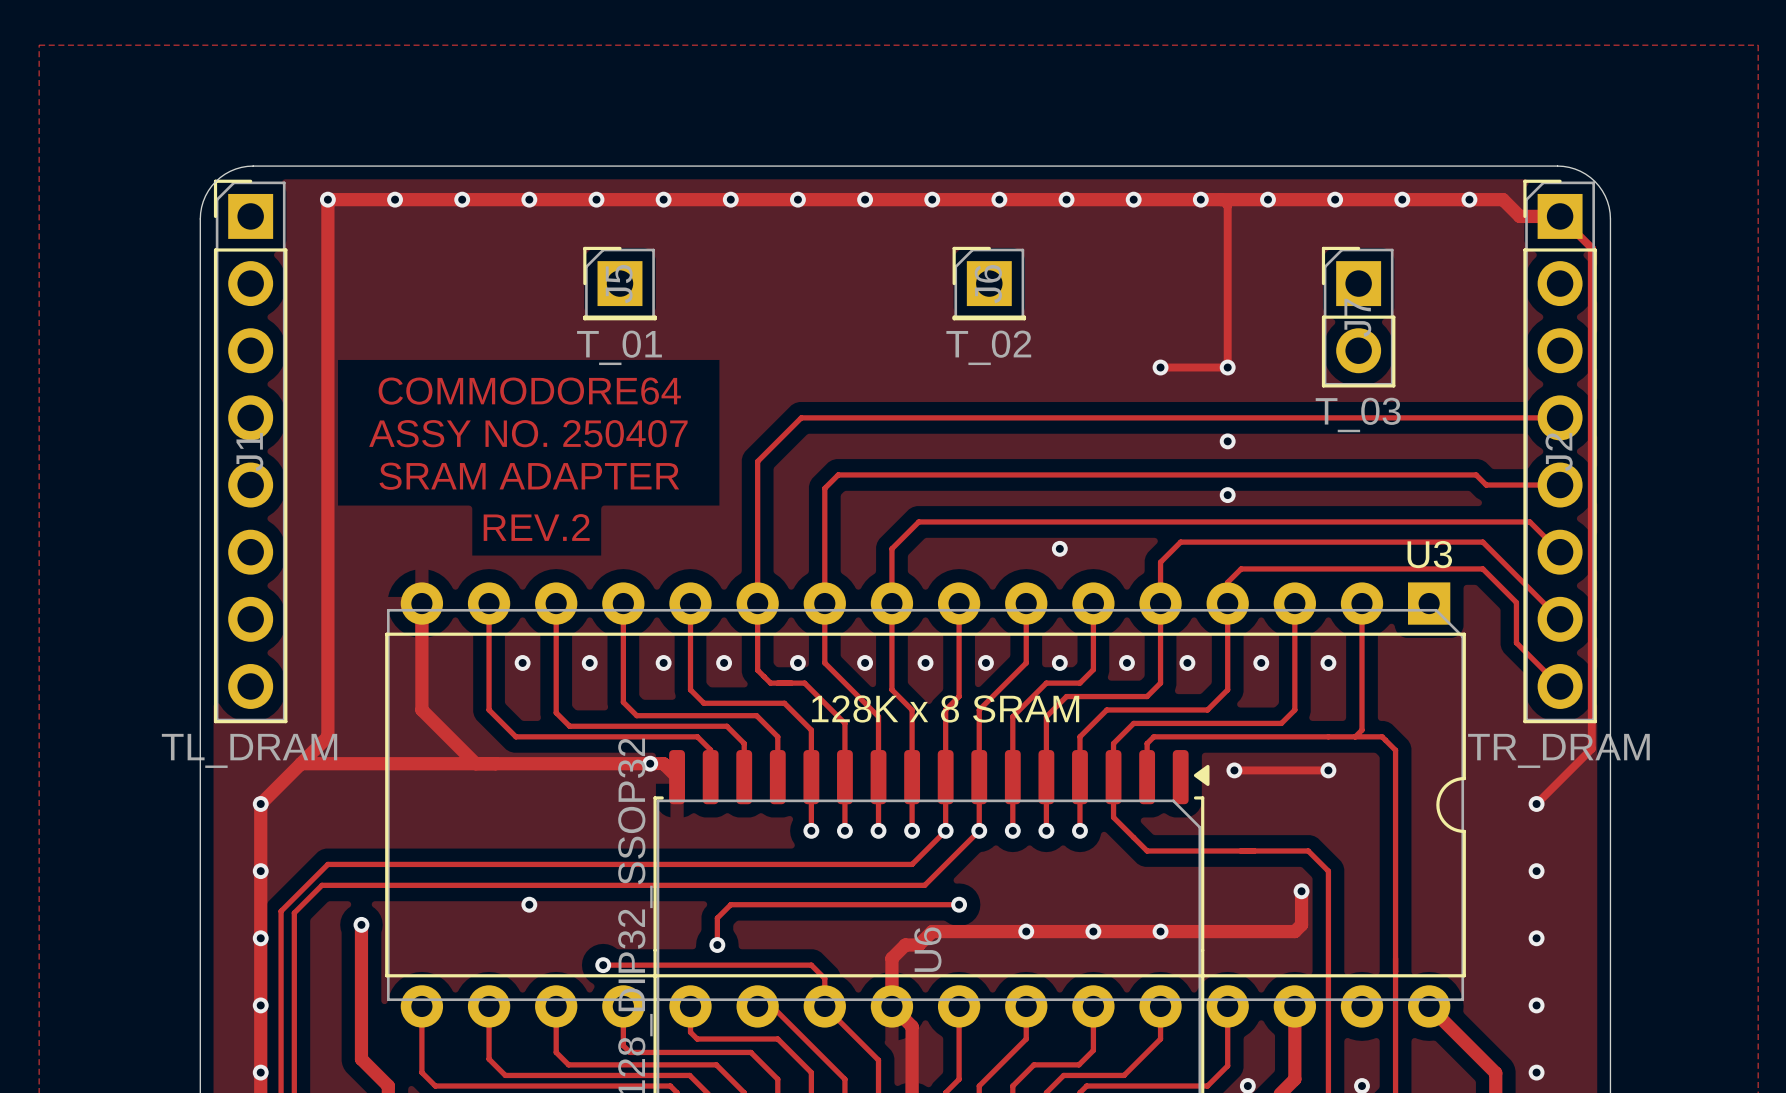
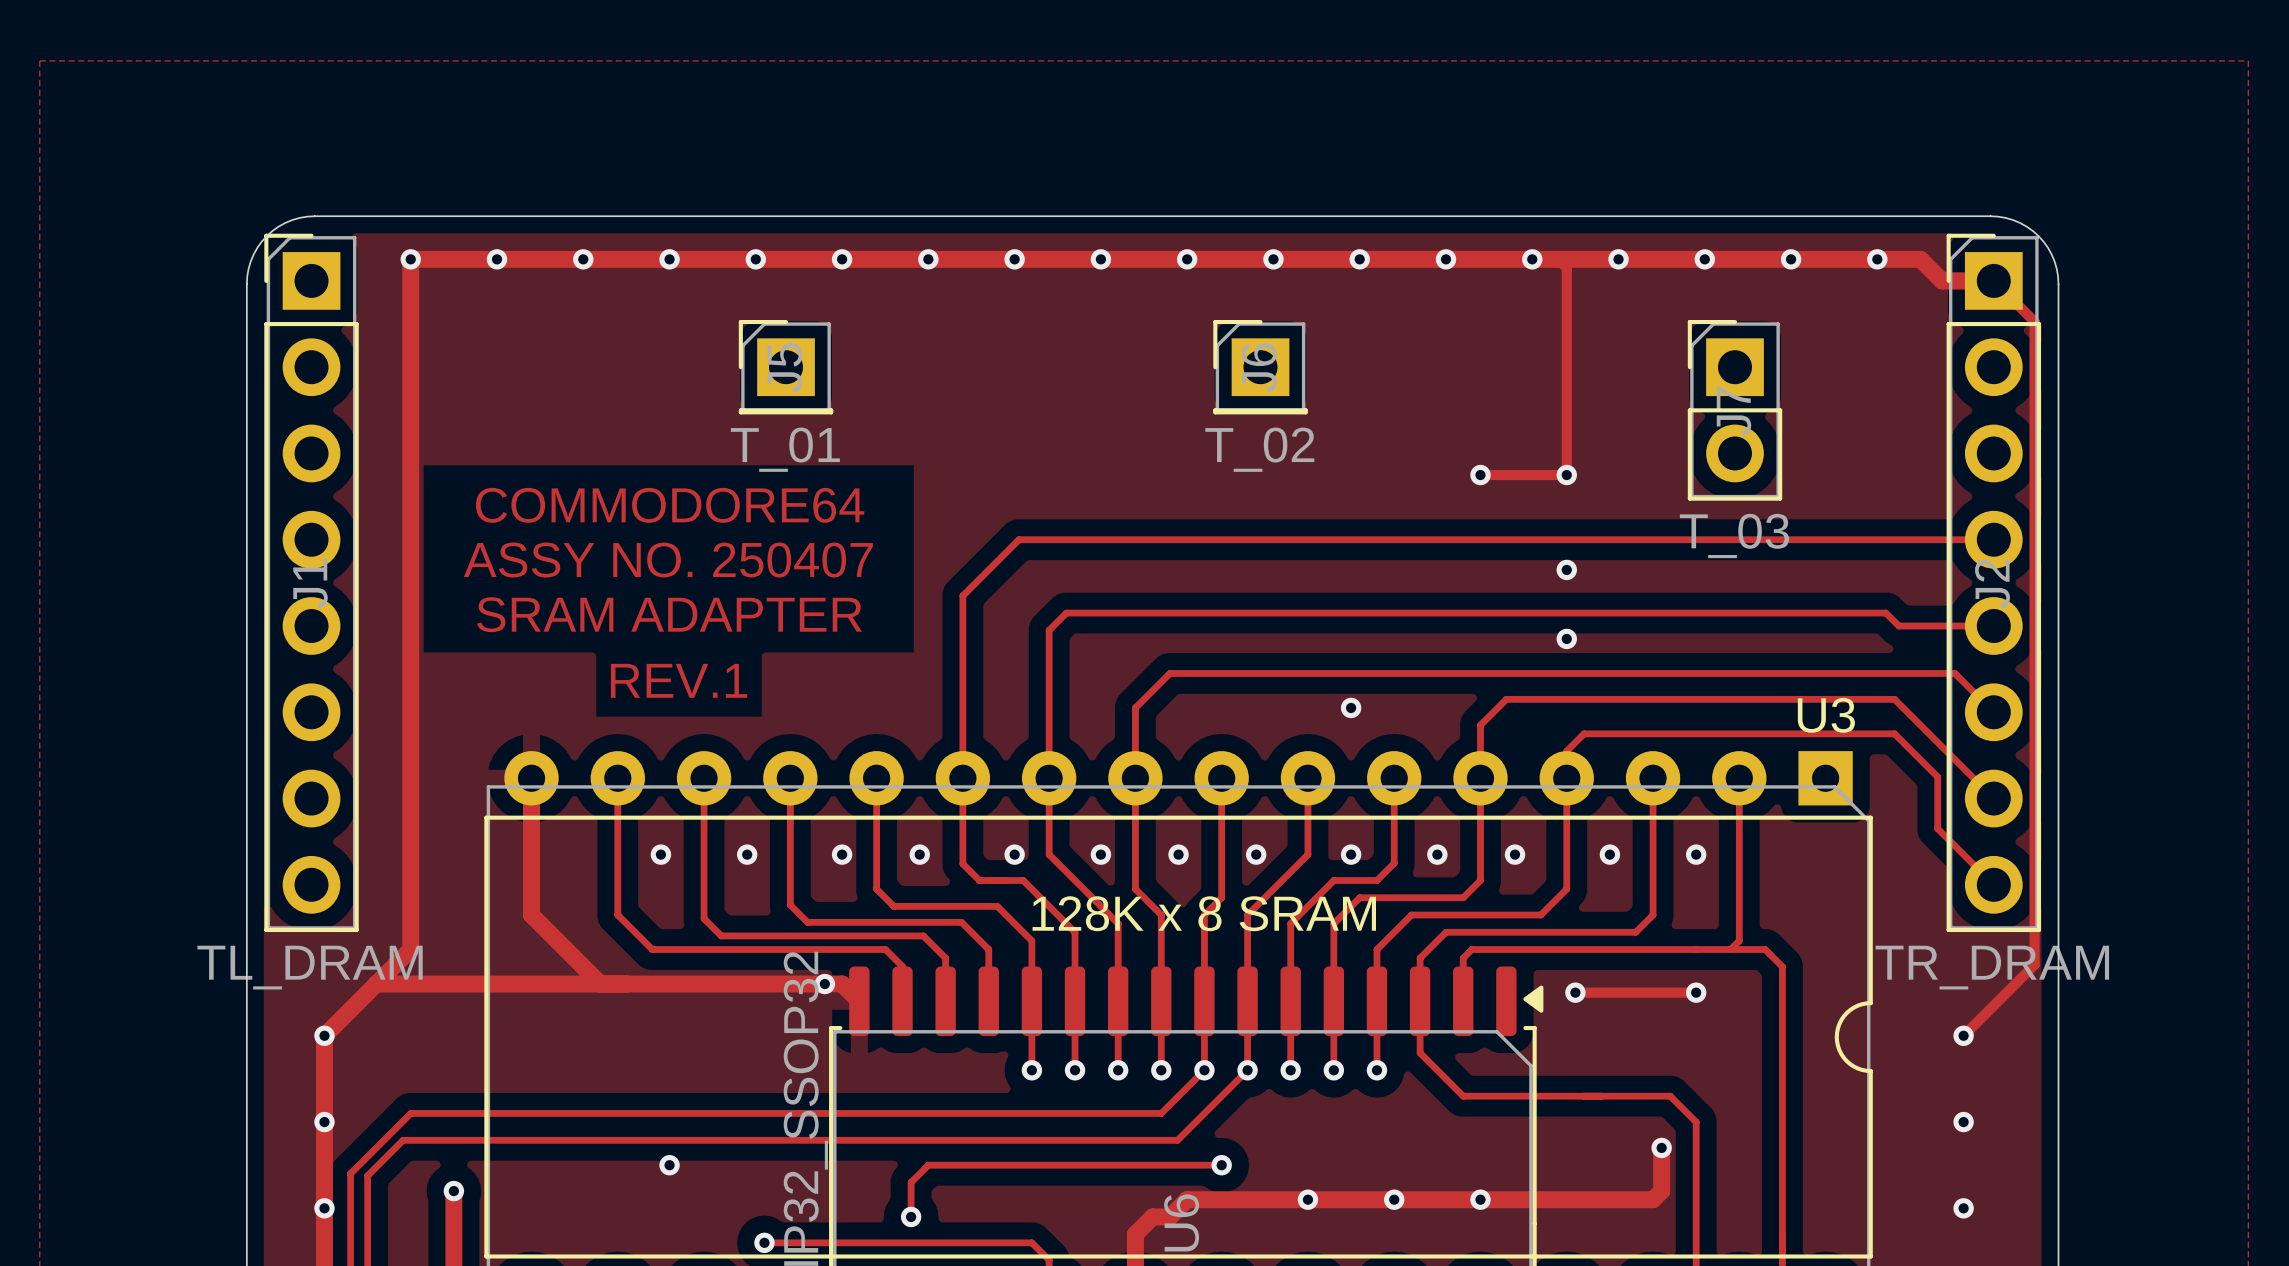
text: REV.2 (536, 527) -> REV.1 (679, 680)

